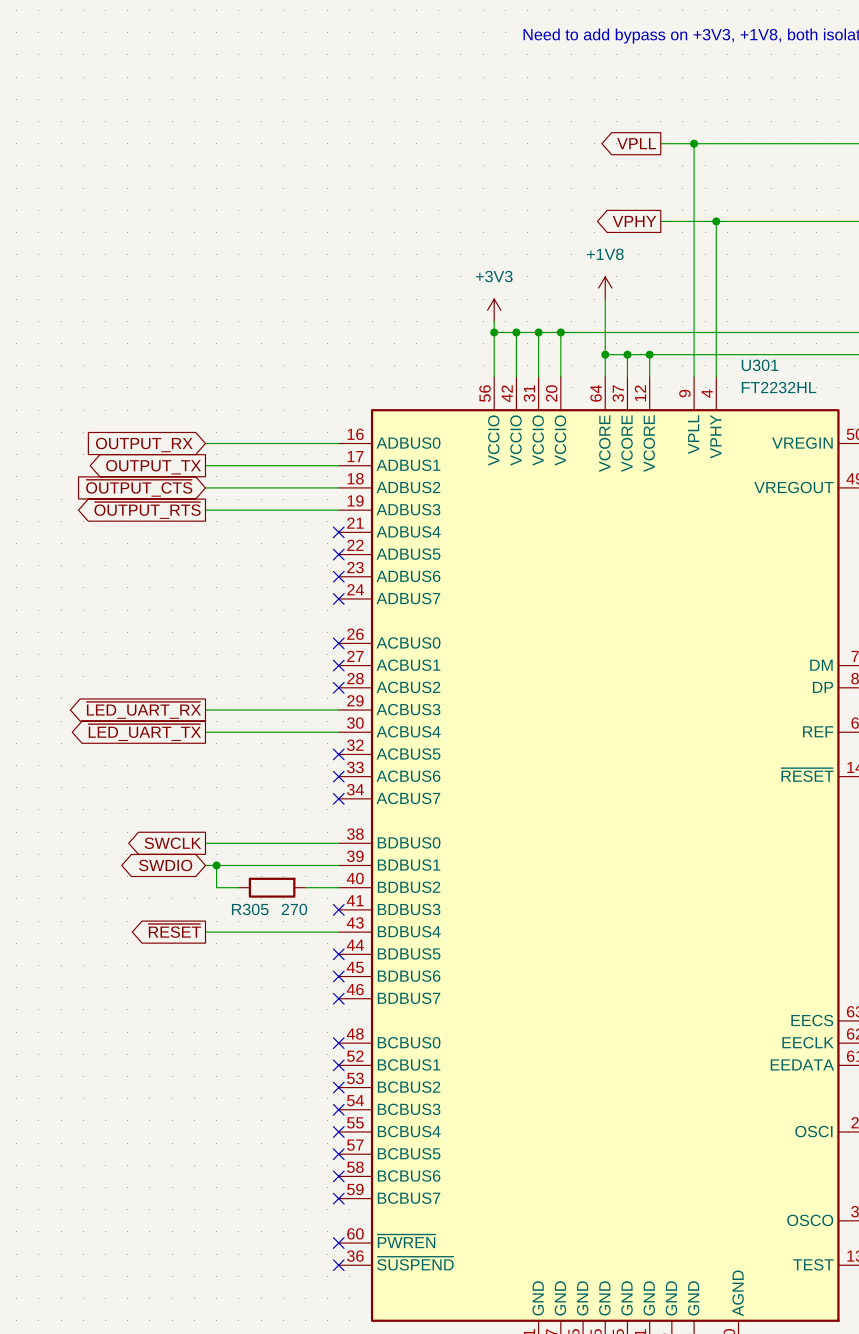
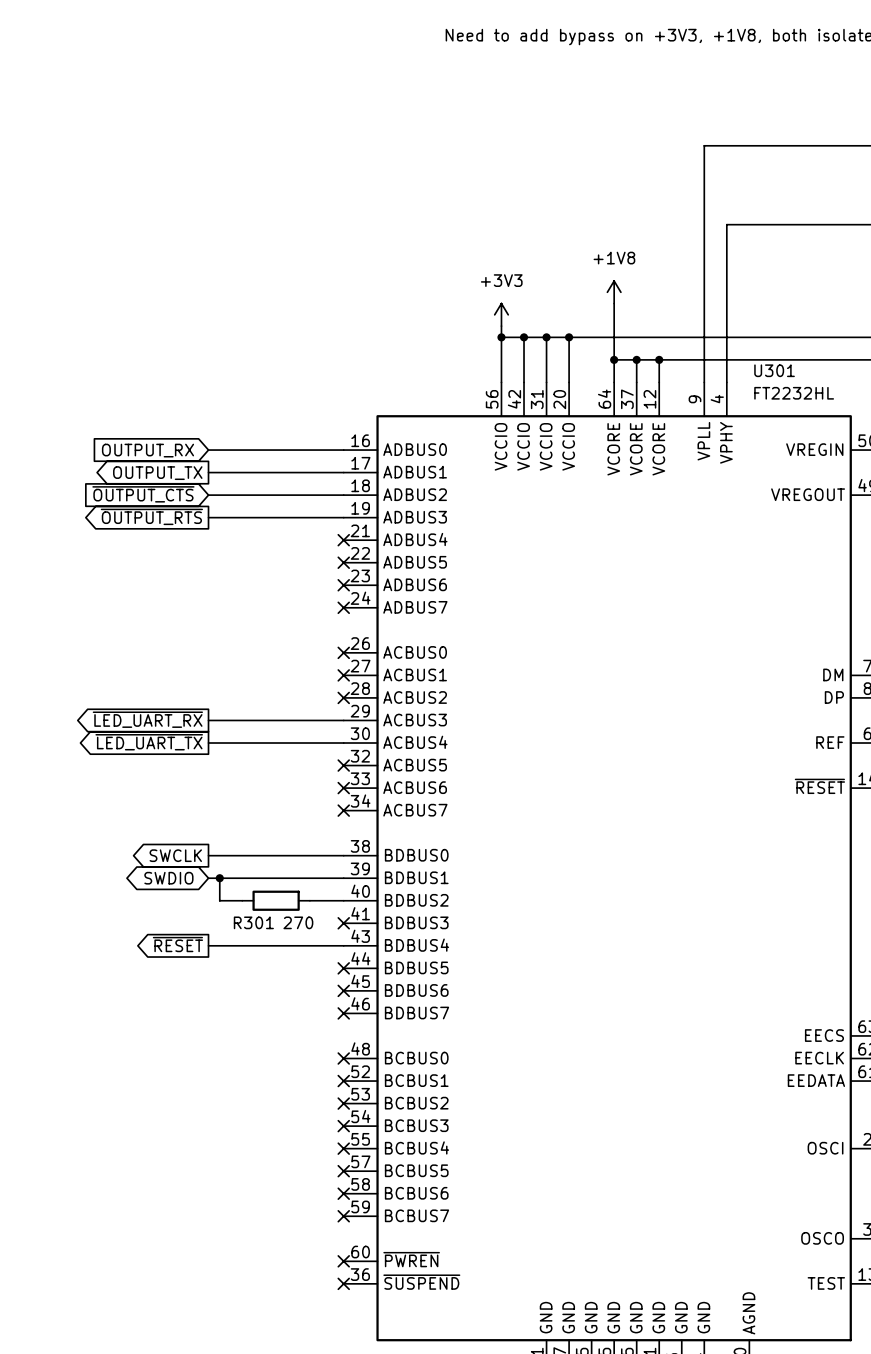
global label: VPLL (636, 143) -> none
wire: (660, 143) (694, 143) -> none
junction: (694, 143) -> none
global label: VPHY (634, 221) -> none
wire: (660, 221) (716, 221) -> none
junction: (716, 221) -> none
R305 name: R305 (250, 909) -> R301 (253, 922)

